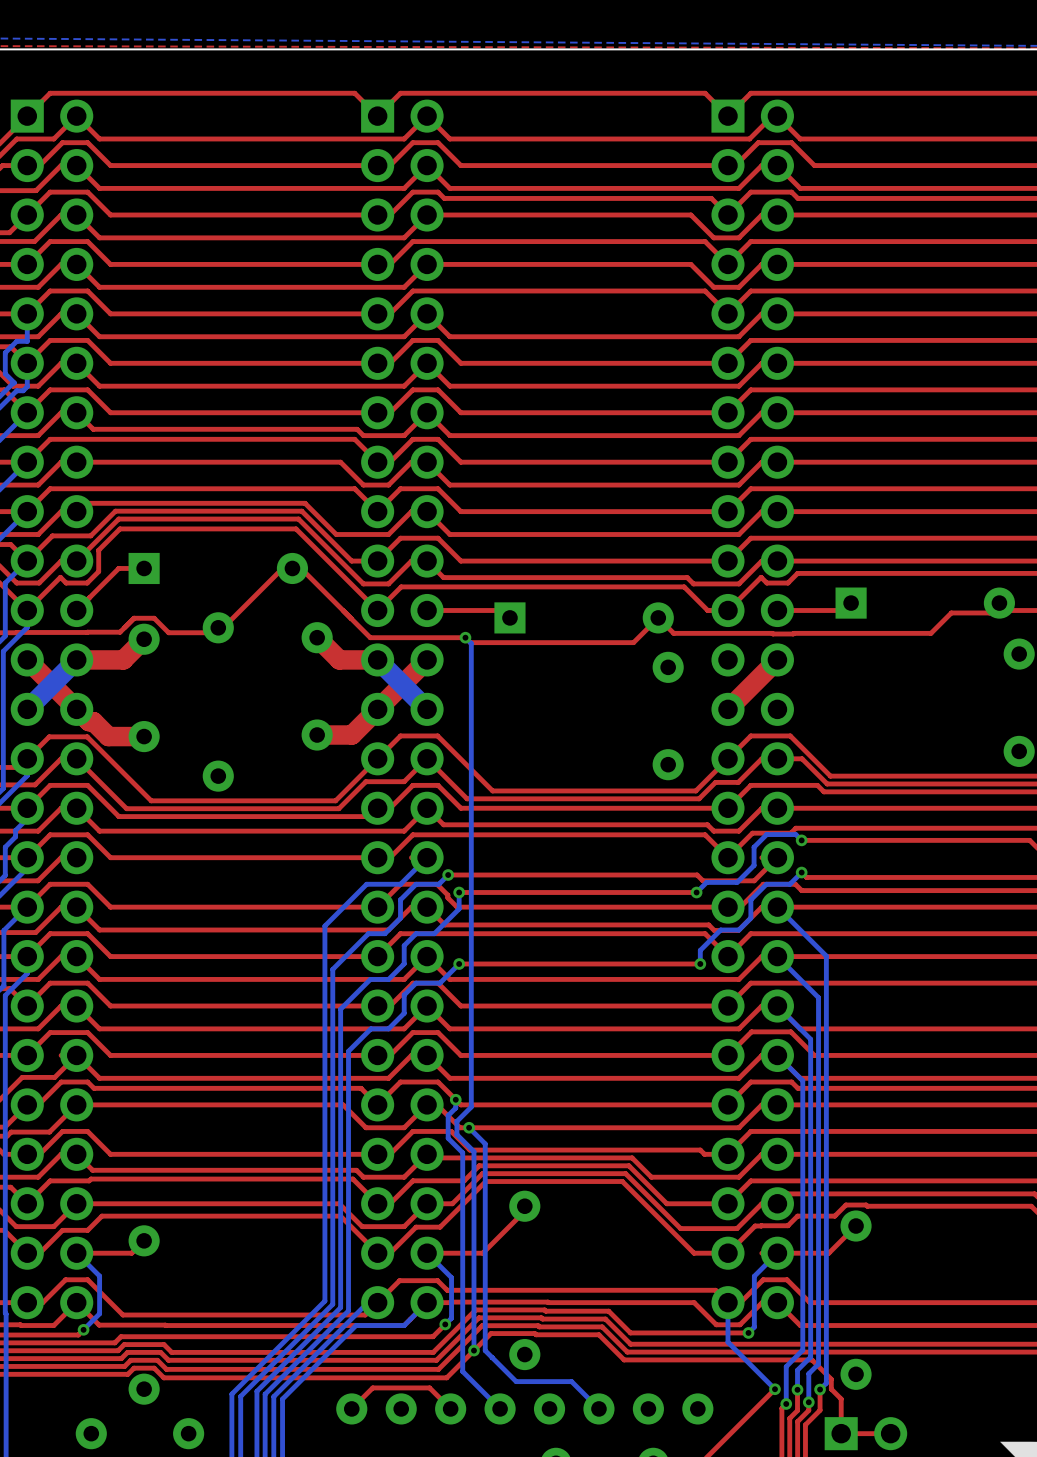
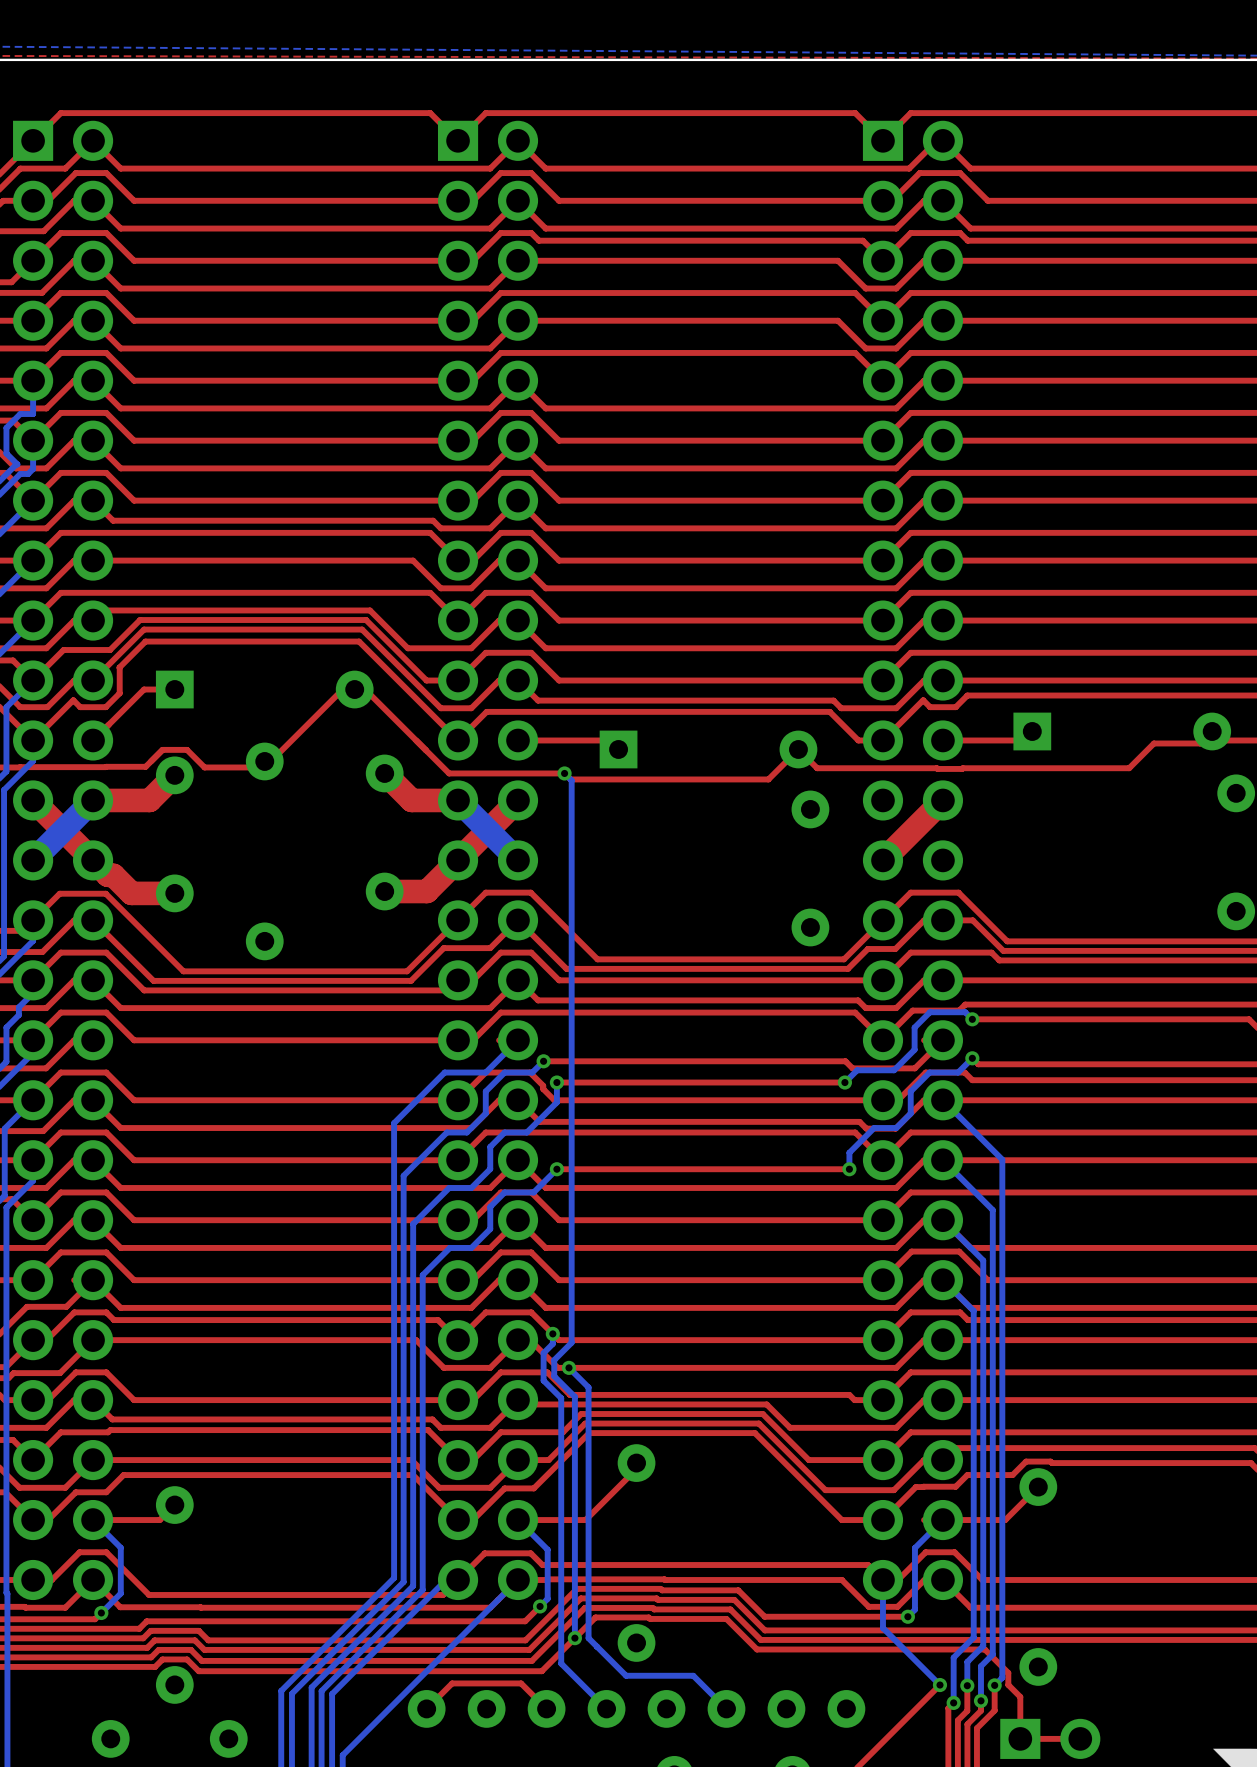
bottom track: (404, 1325) (356, 1325) (282, 1399) (282, 1447) -> (490, 1607) (342, 1755)

